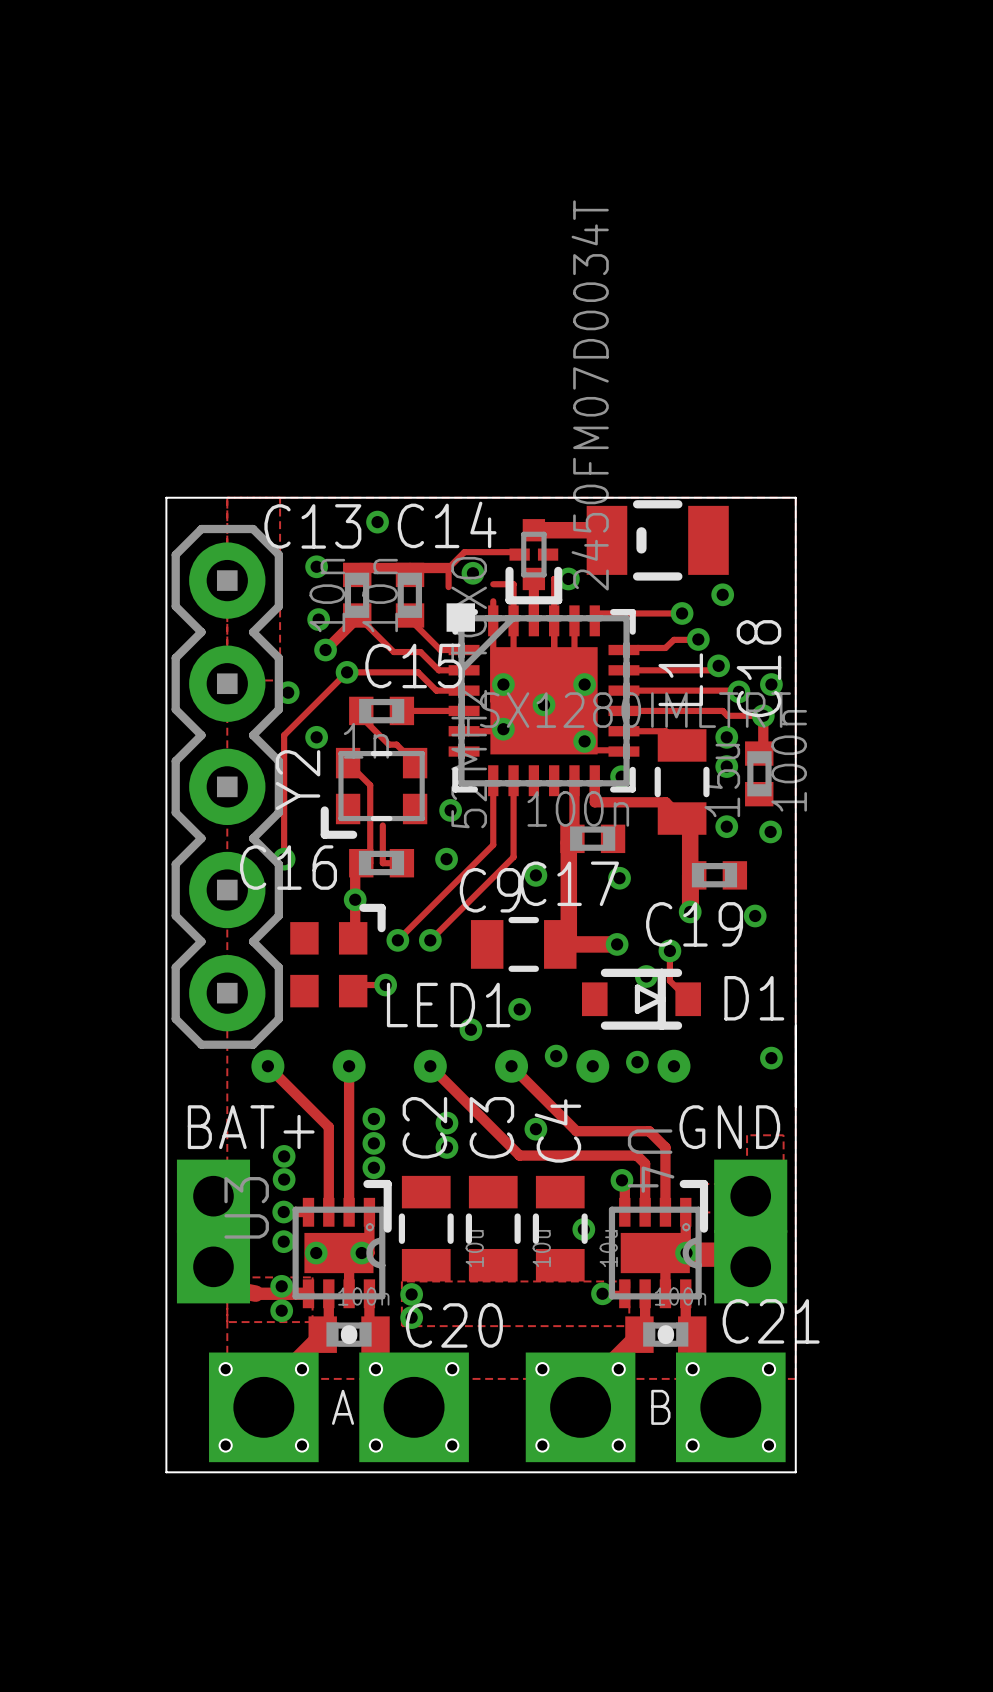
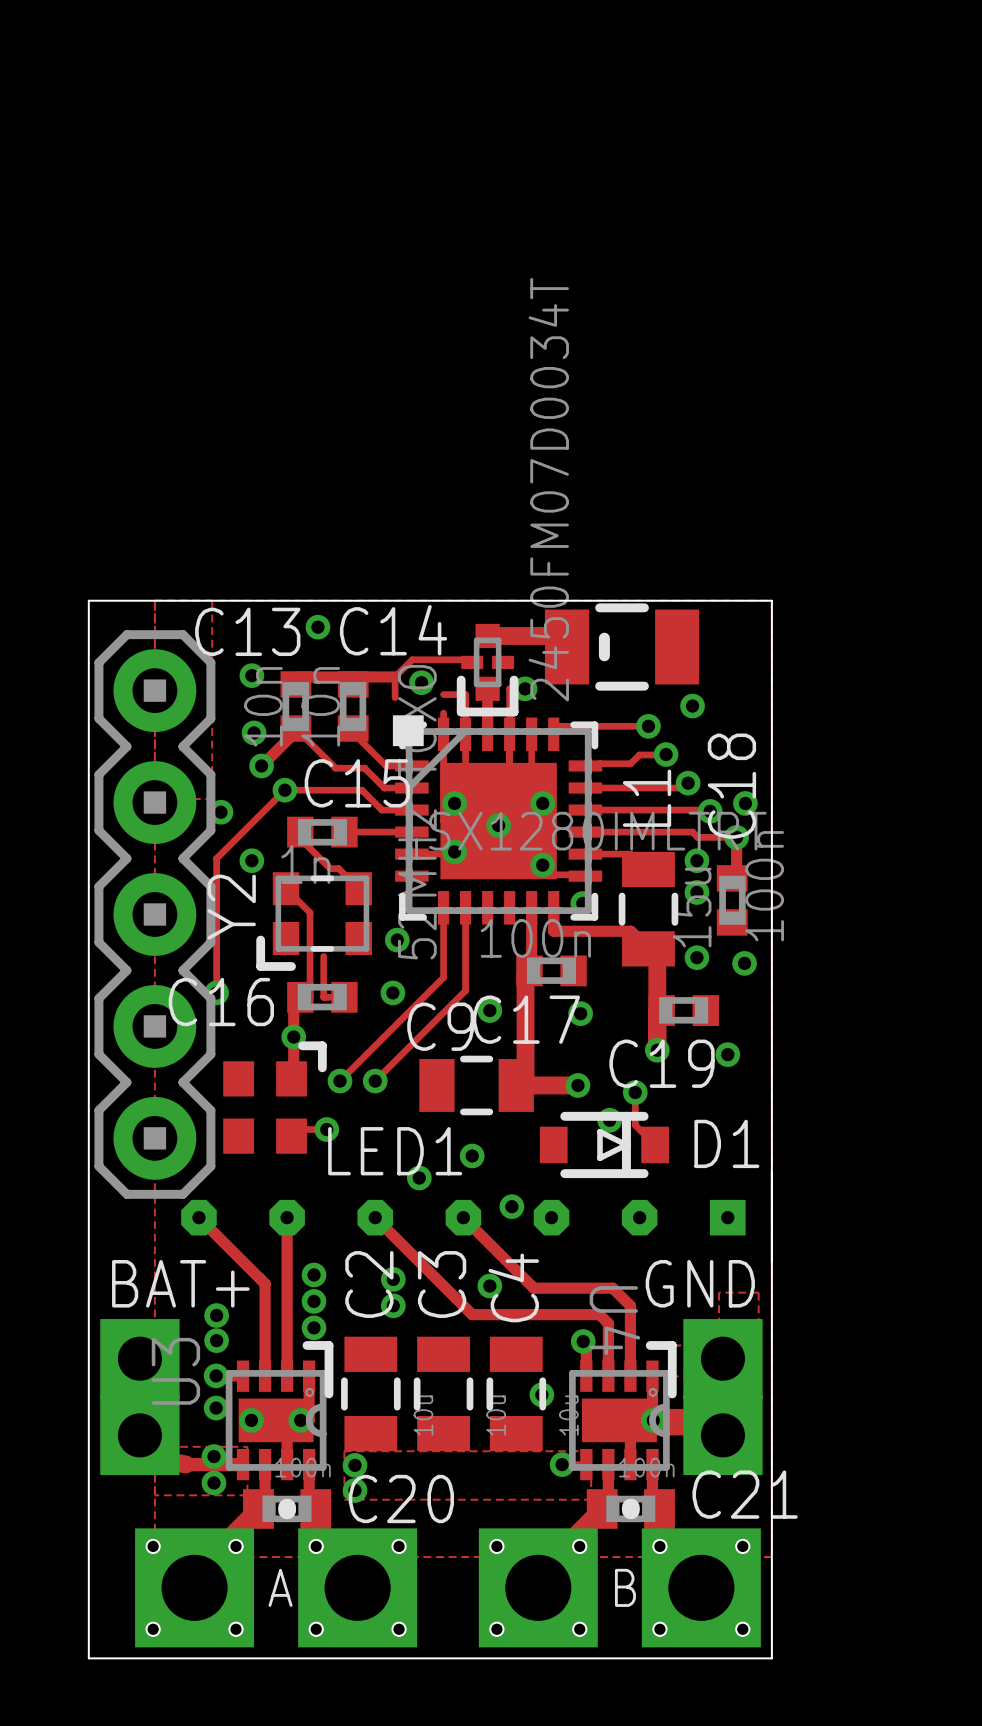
via: (771, 1058) -> none
via: (637, 1062) -> none
via: (267, 1066) -> none
via: (349, 1066) -> none
via: (430, 1066) -> none
via: (511, 1066) -> none
part: none -> (463, 1217)
via: (592, 1066) -> none
via: (673, 1066) -> none

